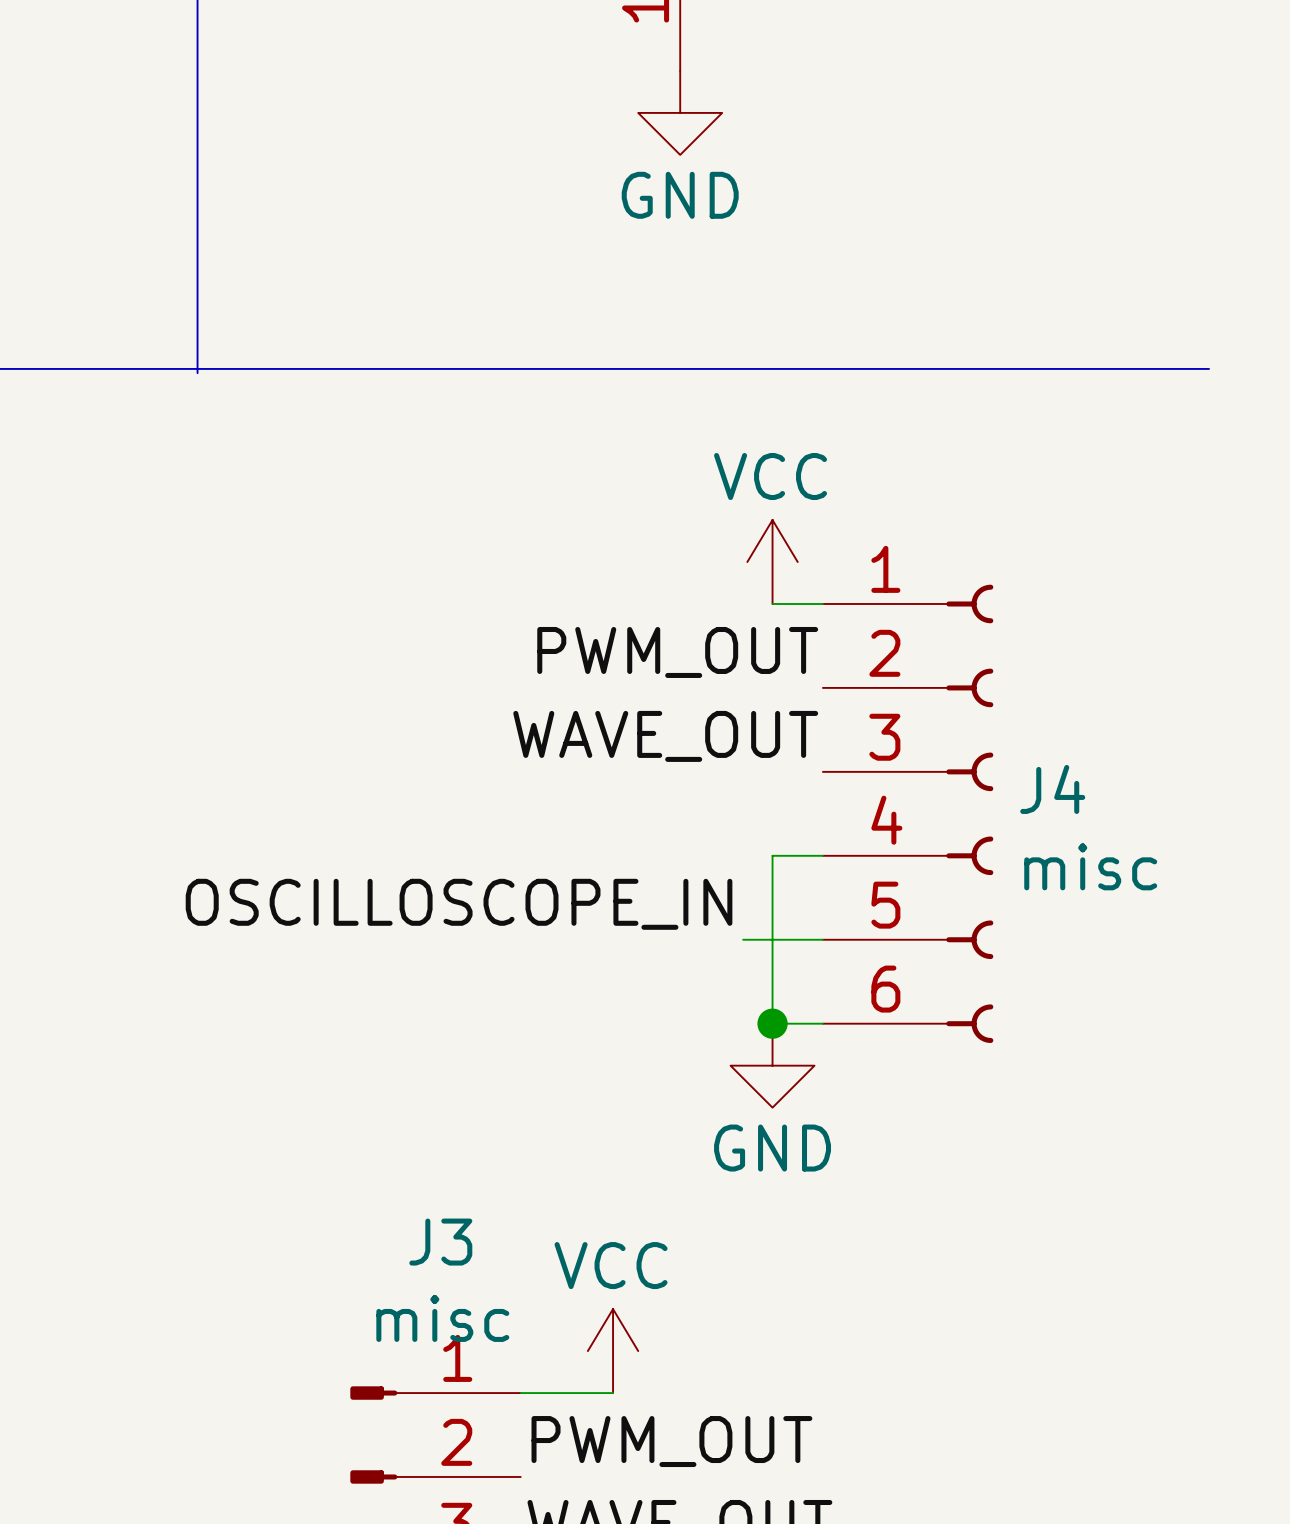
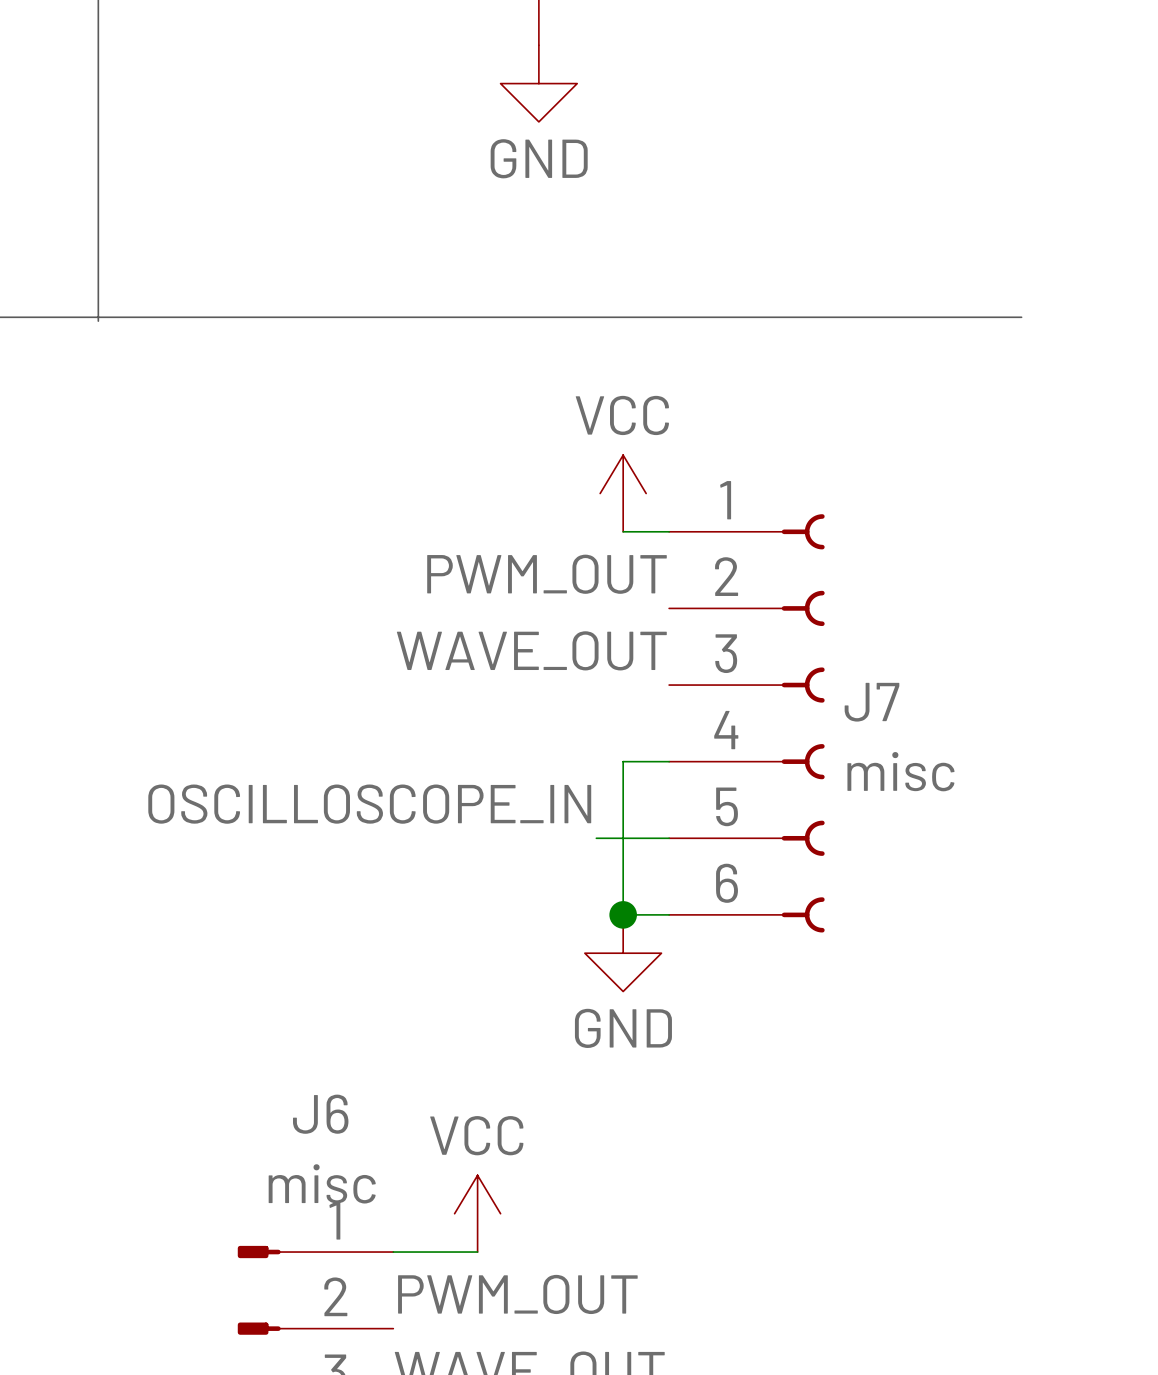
J4 name: J4 (1052, 789) -> J7 (871, 702)
J3 name: J3 (440, 1242) -> J6 (320, 1114)

